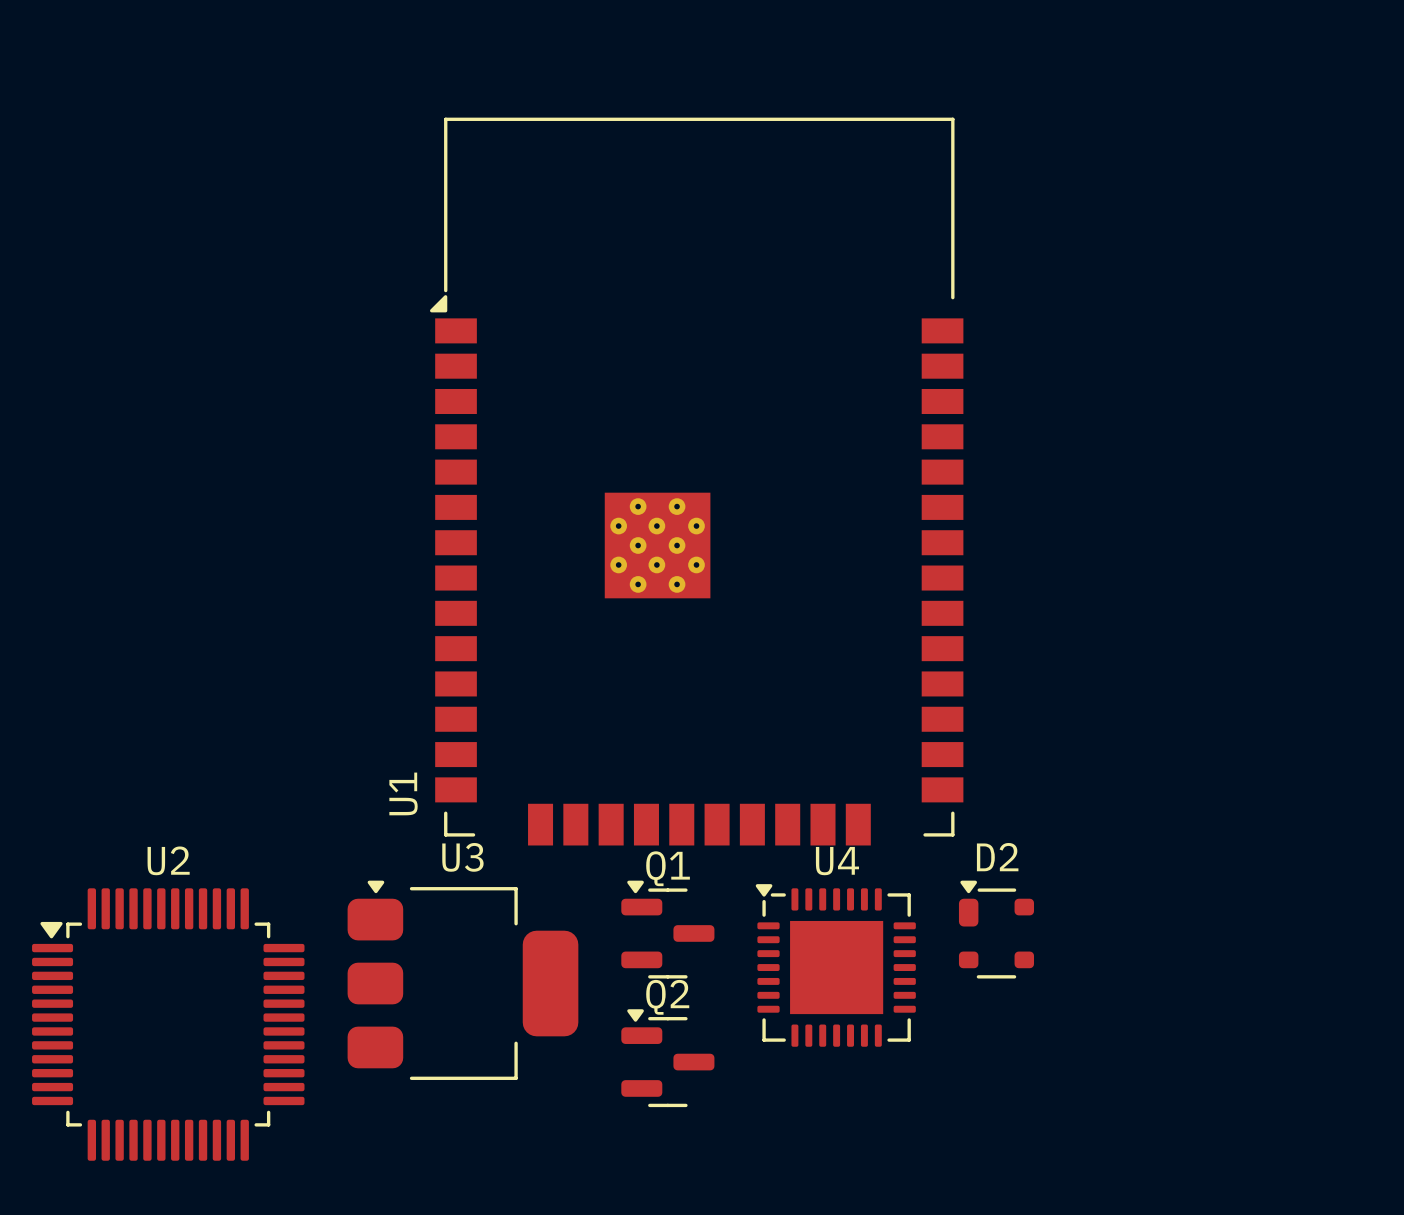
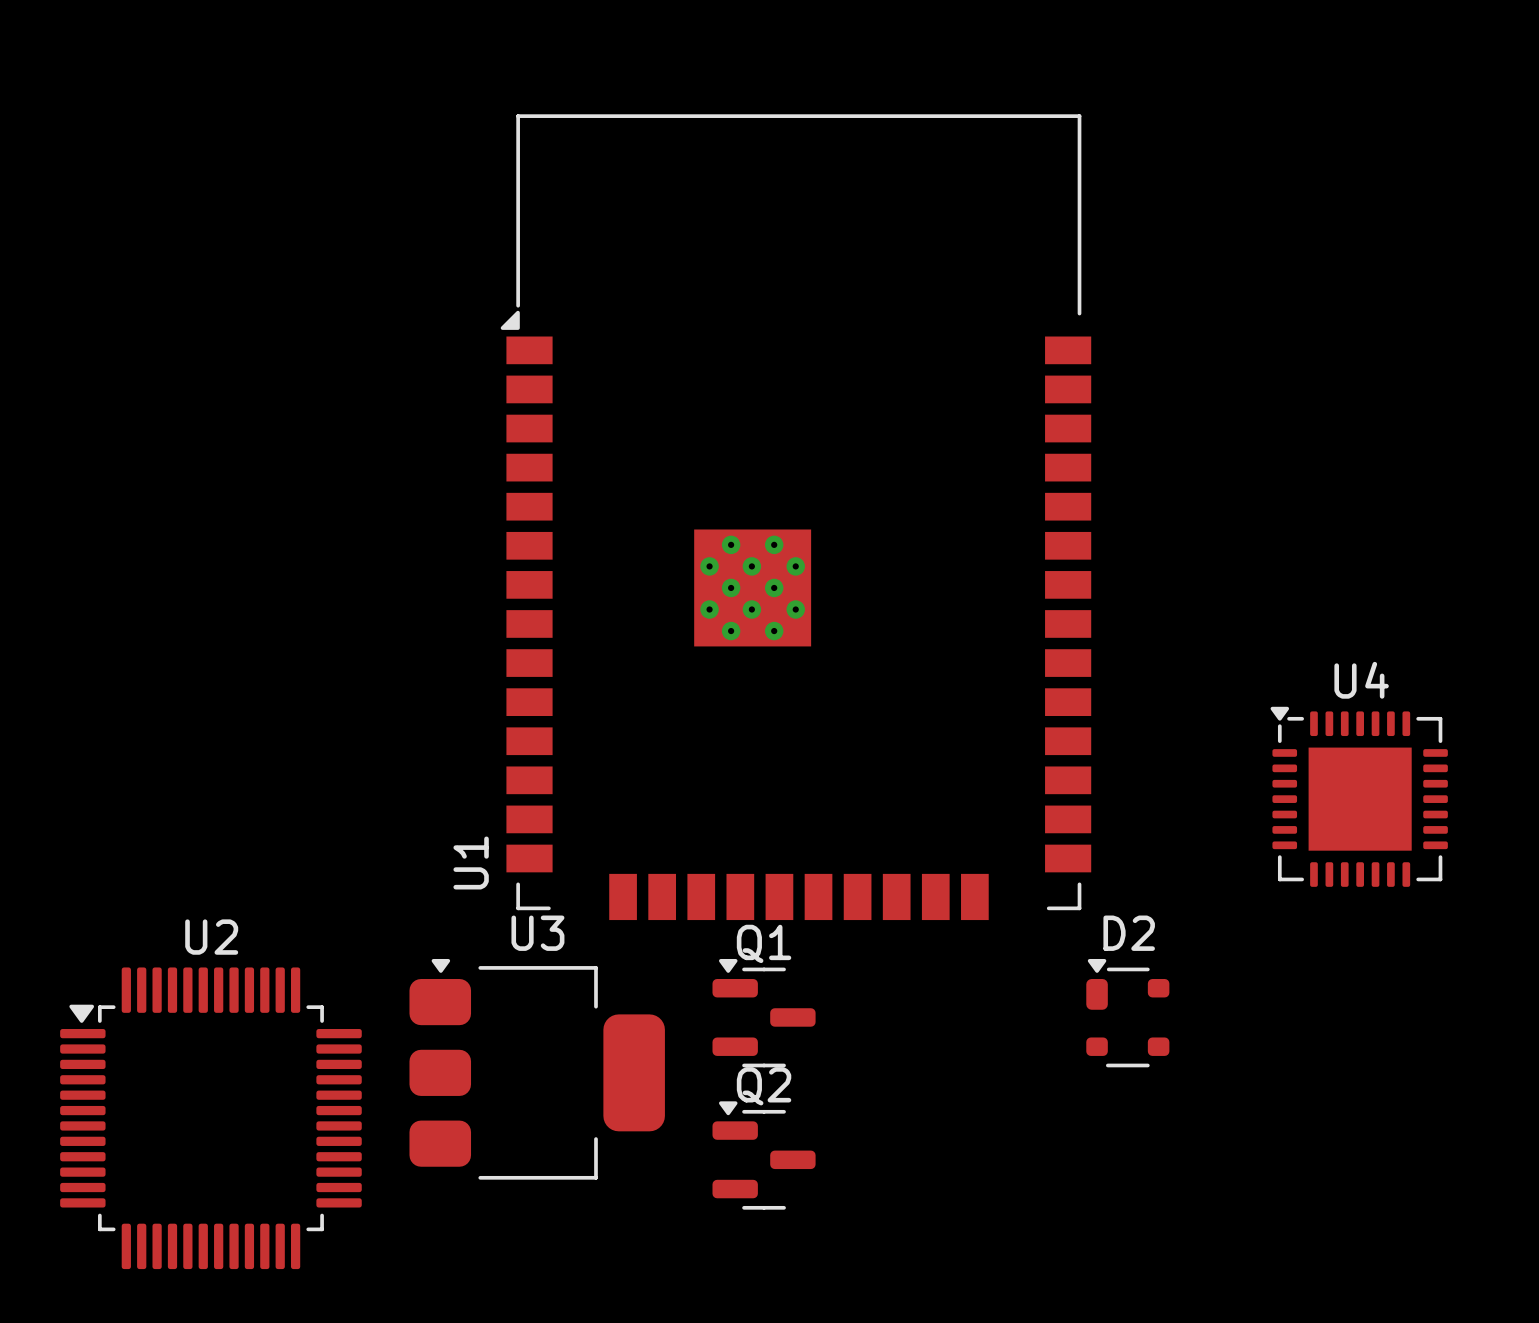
U4 position: (835, 965) -> (1359, 796)

